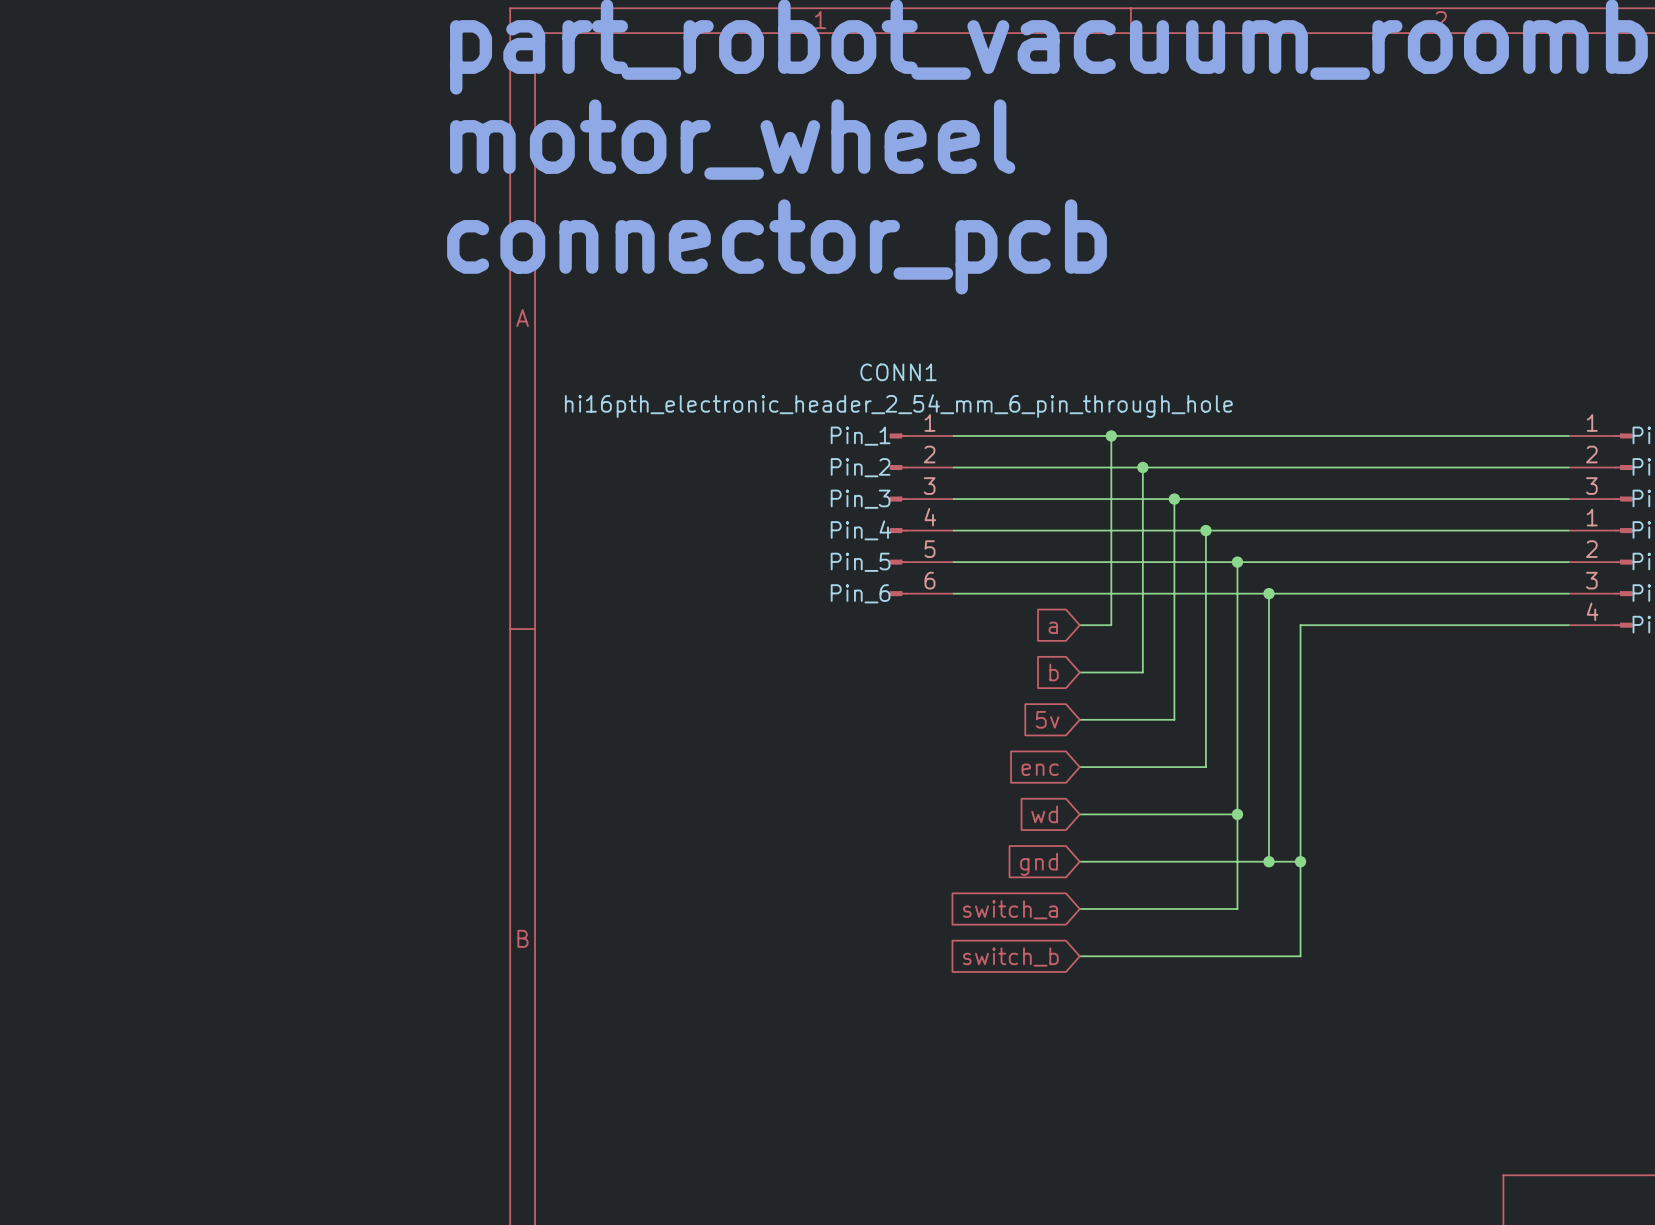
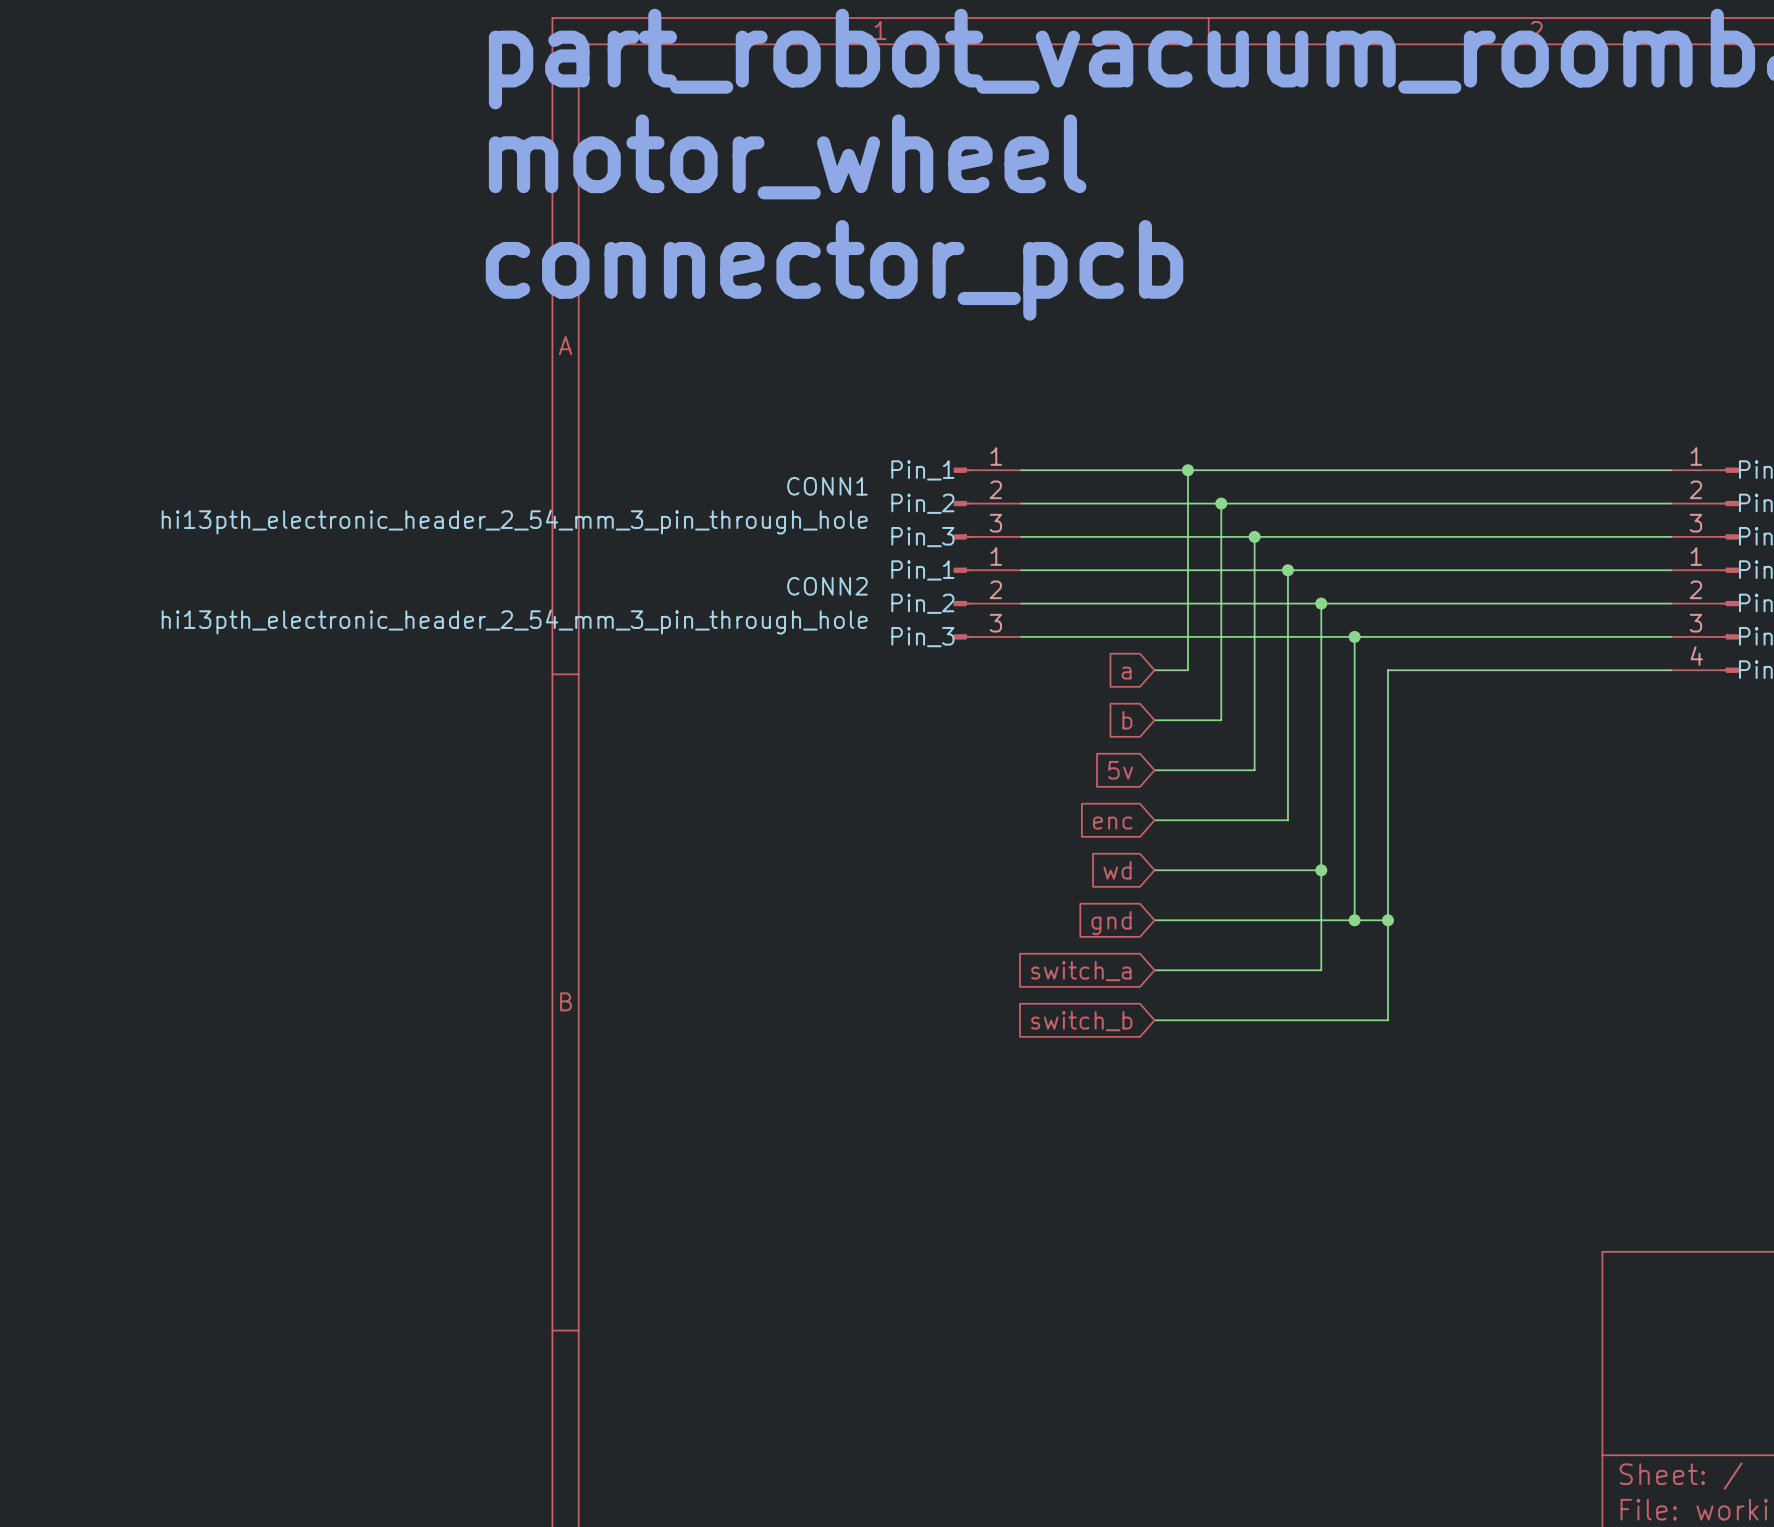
CONN1 name position: CONN1 (898, 372) -> CONN1 (827, 486)
CONN1 value: hi16pth_electronic_header_2_54_mm_6_pin_through_hole (898, 406) -> hi13pth_electronic_header_2_54_mm_3_pin_through_hole (514, 522)
CONN1 symbol: [889, 433, 954, 597] -> [953, 467, 1022, 540]
CONN2: none -> hi13pth_electronic_header_2_54_mm_3_pin_through_hole (987, 603)

